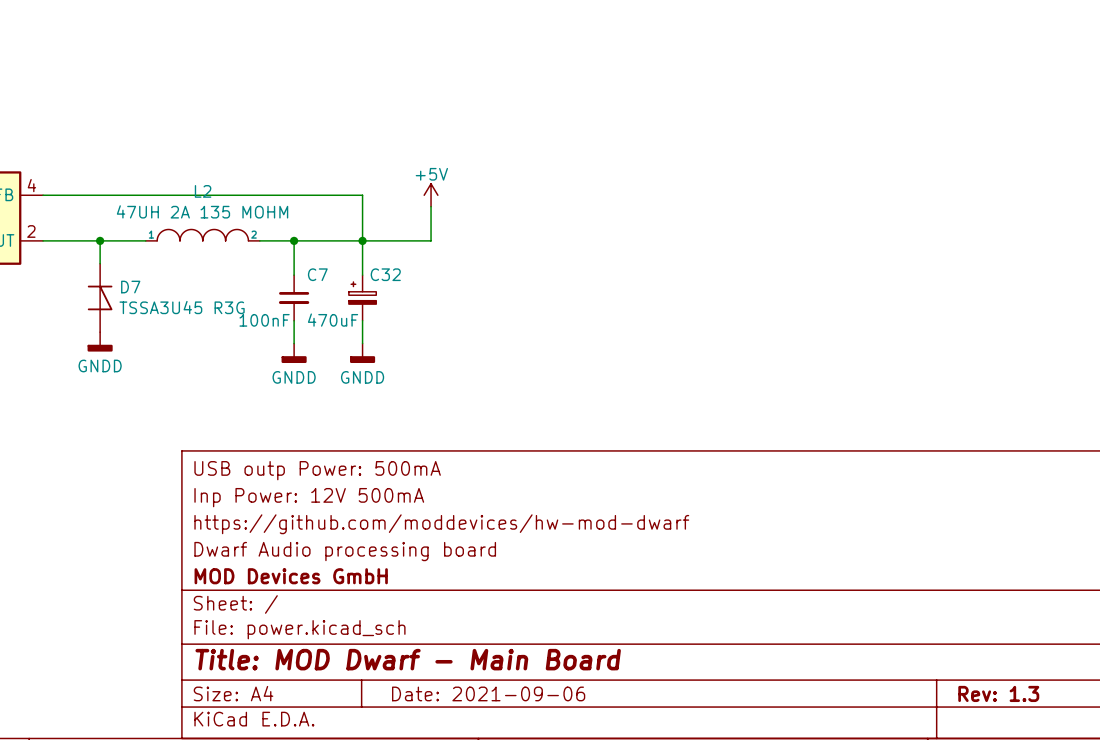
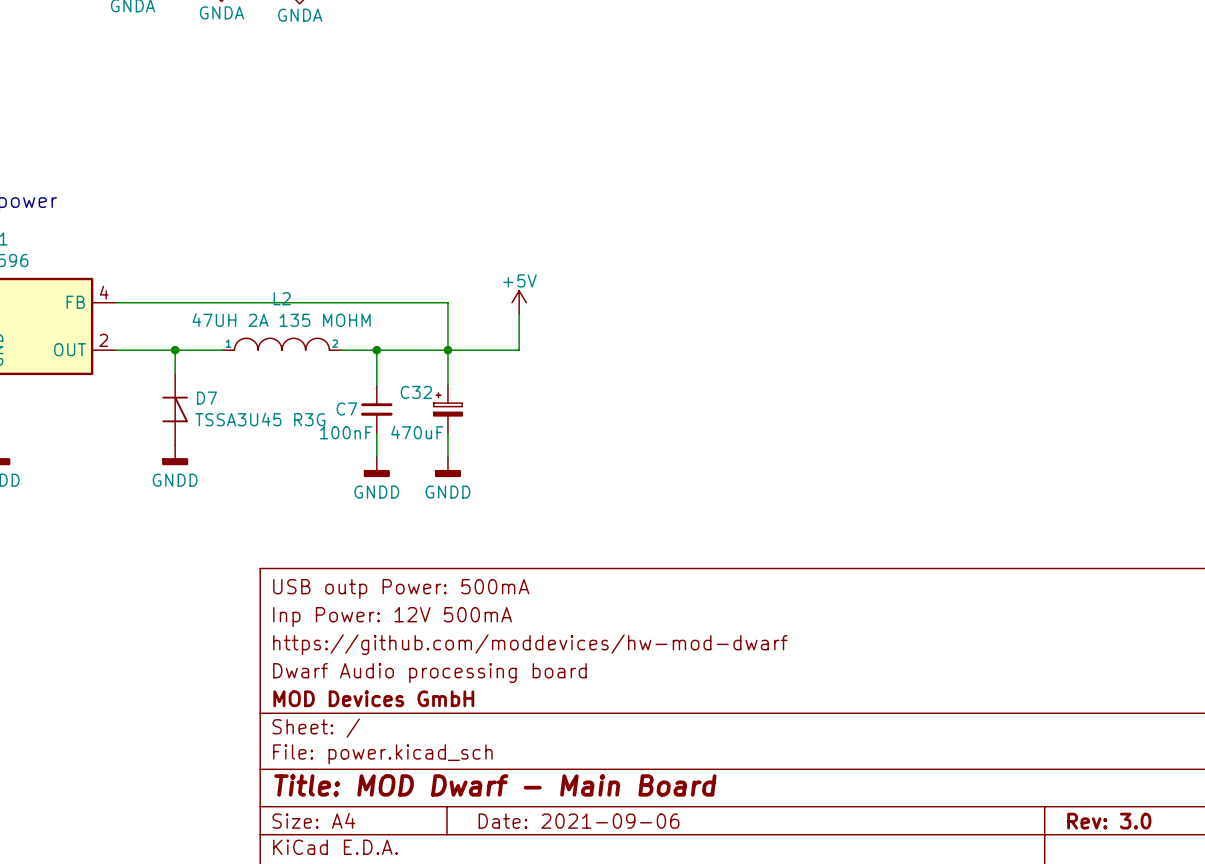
C7 name position: C7 (317, 274) -> C7 (346, 409)
C32 name position: C32 (385, 274) -> C32 (416, 392)
title block: Rev: 1.3 (998, 693) -> Rev: 3.0 (1109, 821)

